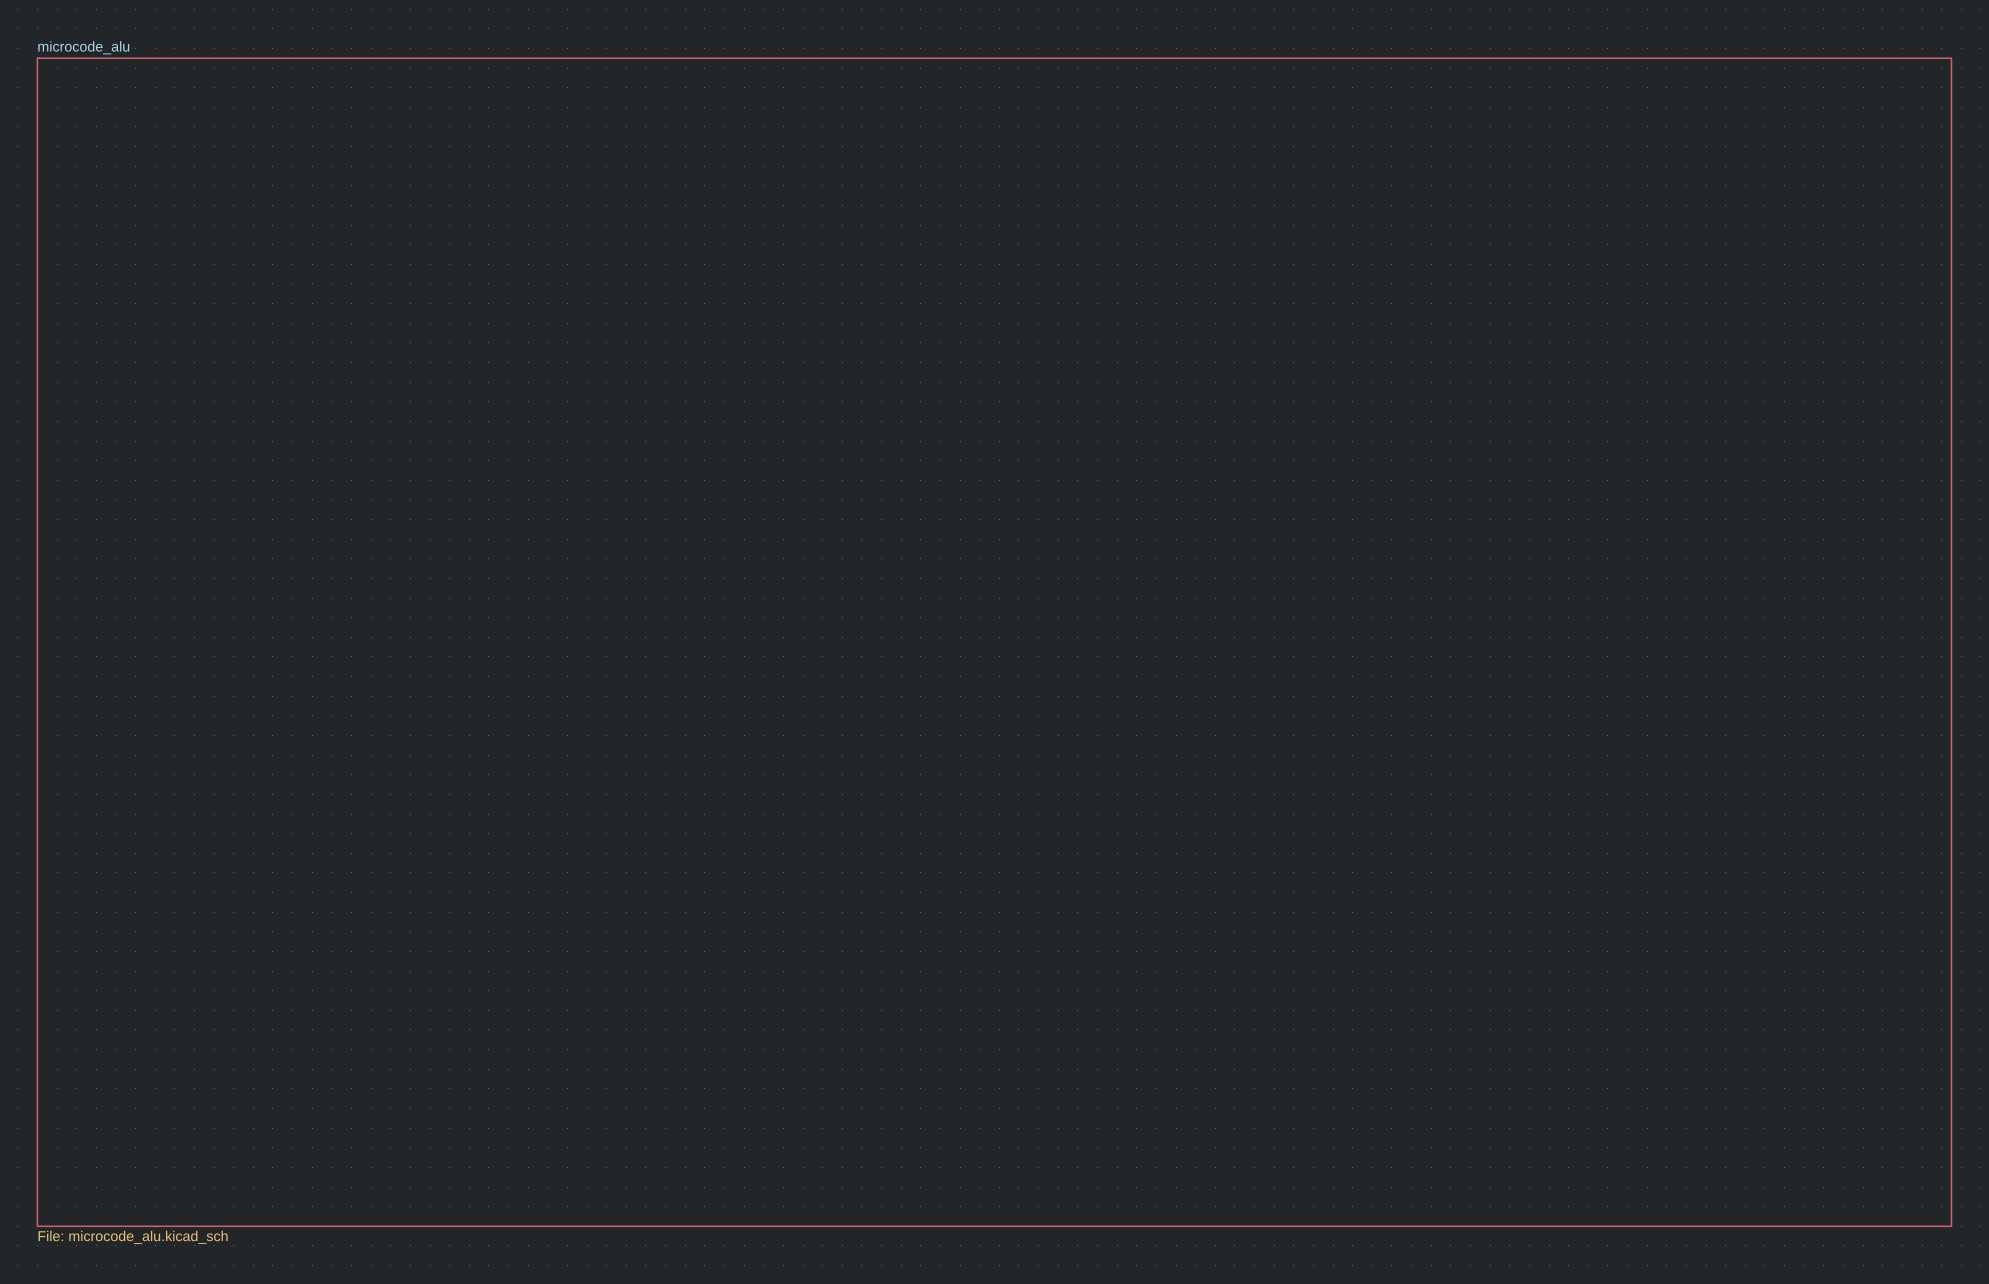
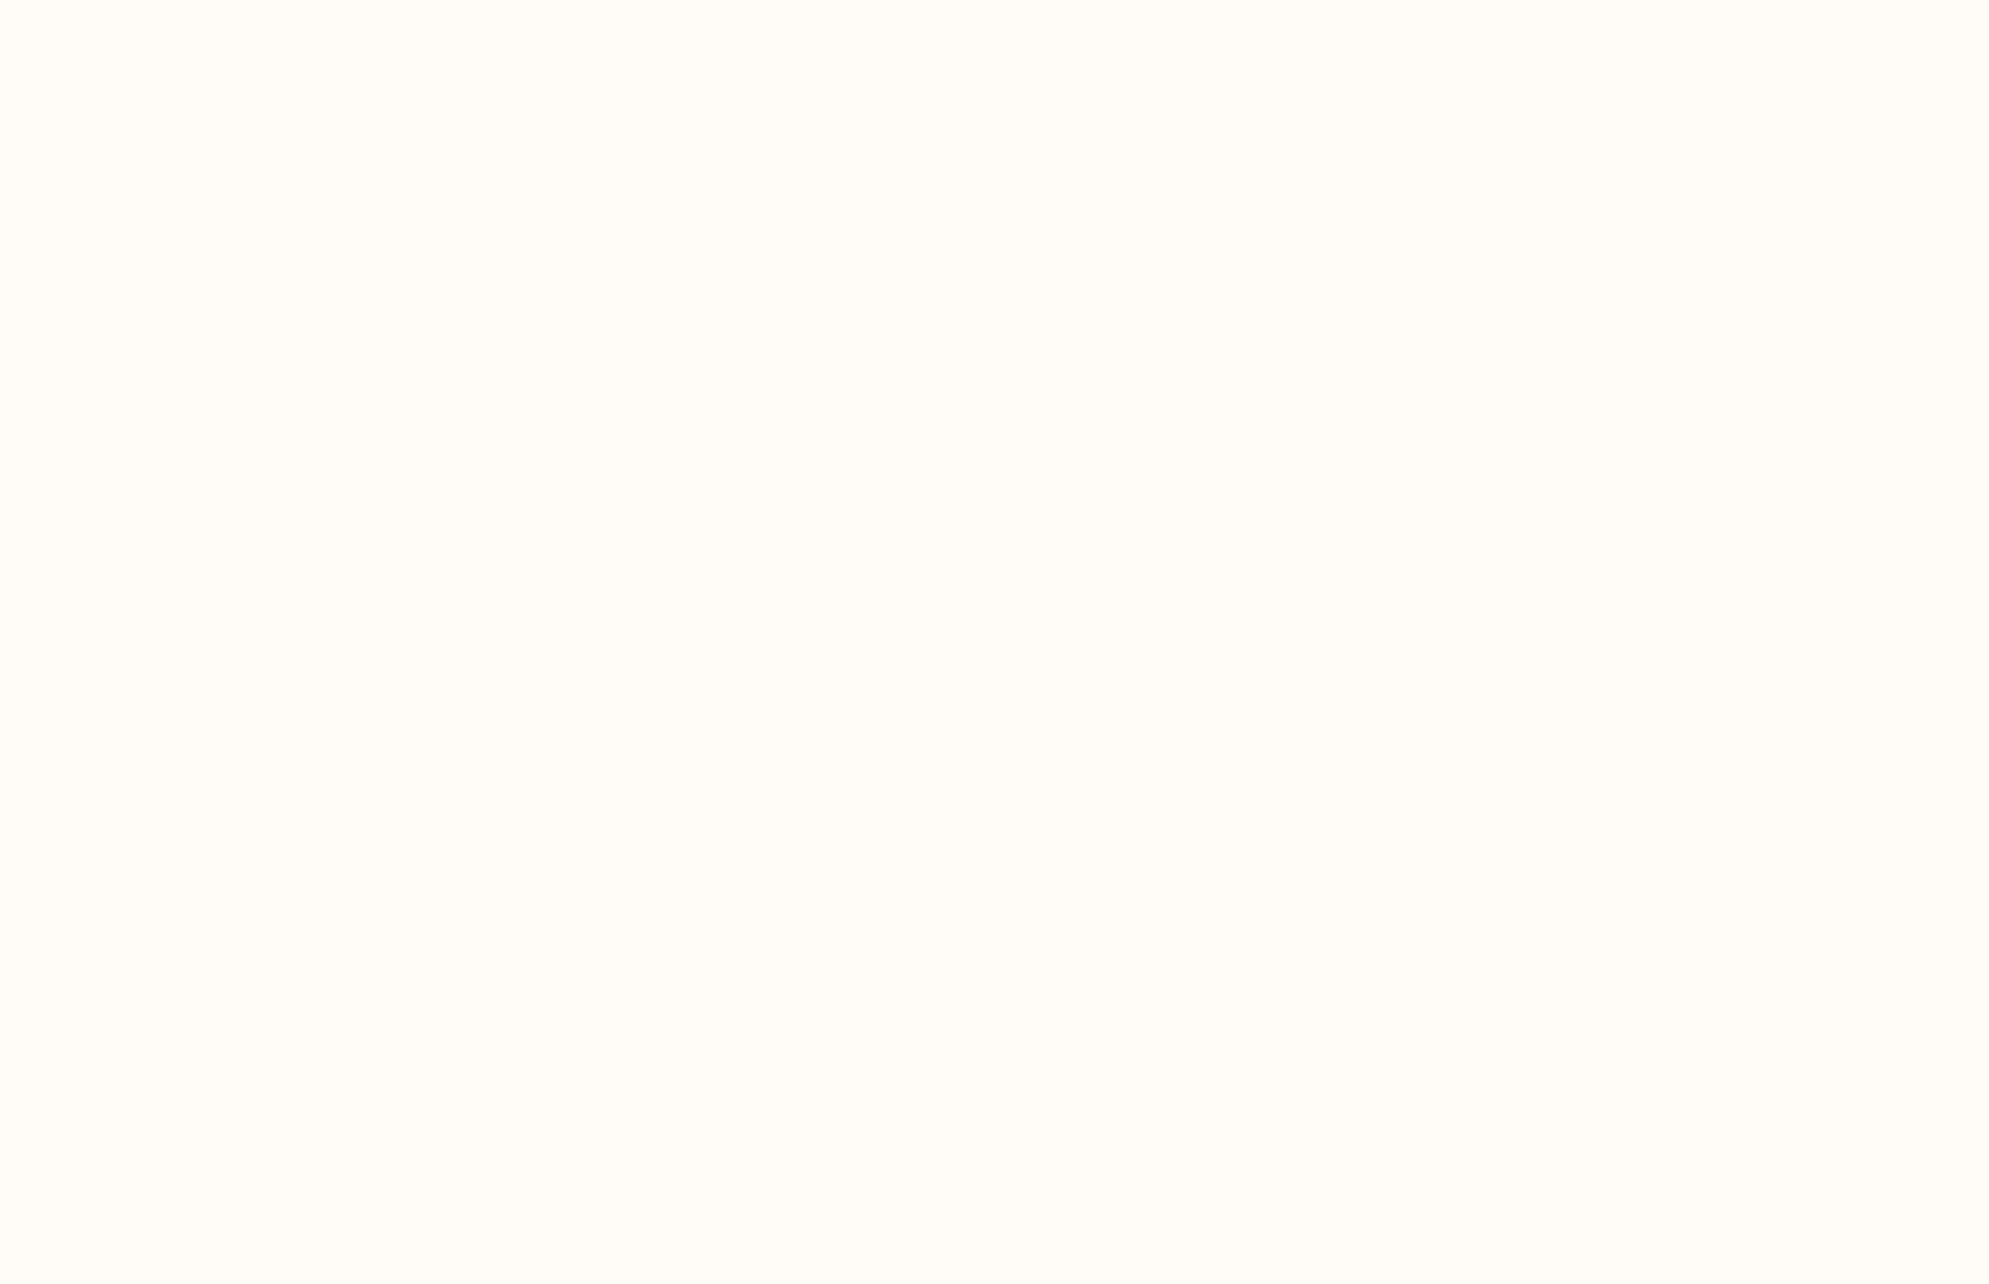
sheet microcode_alu: File: microcode_alu.kicad_sch (994, 642) -> none

